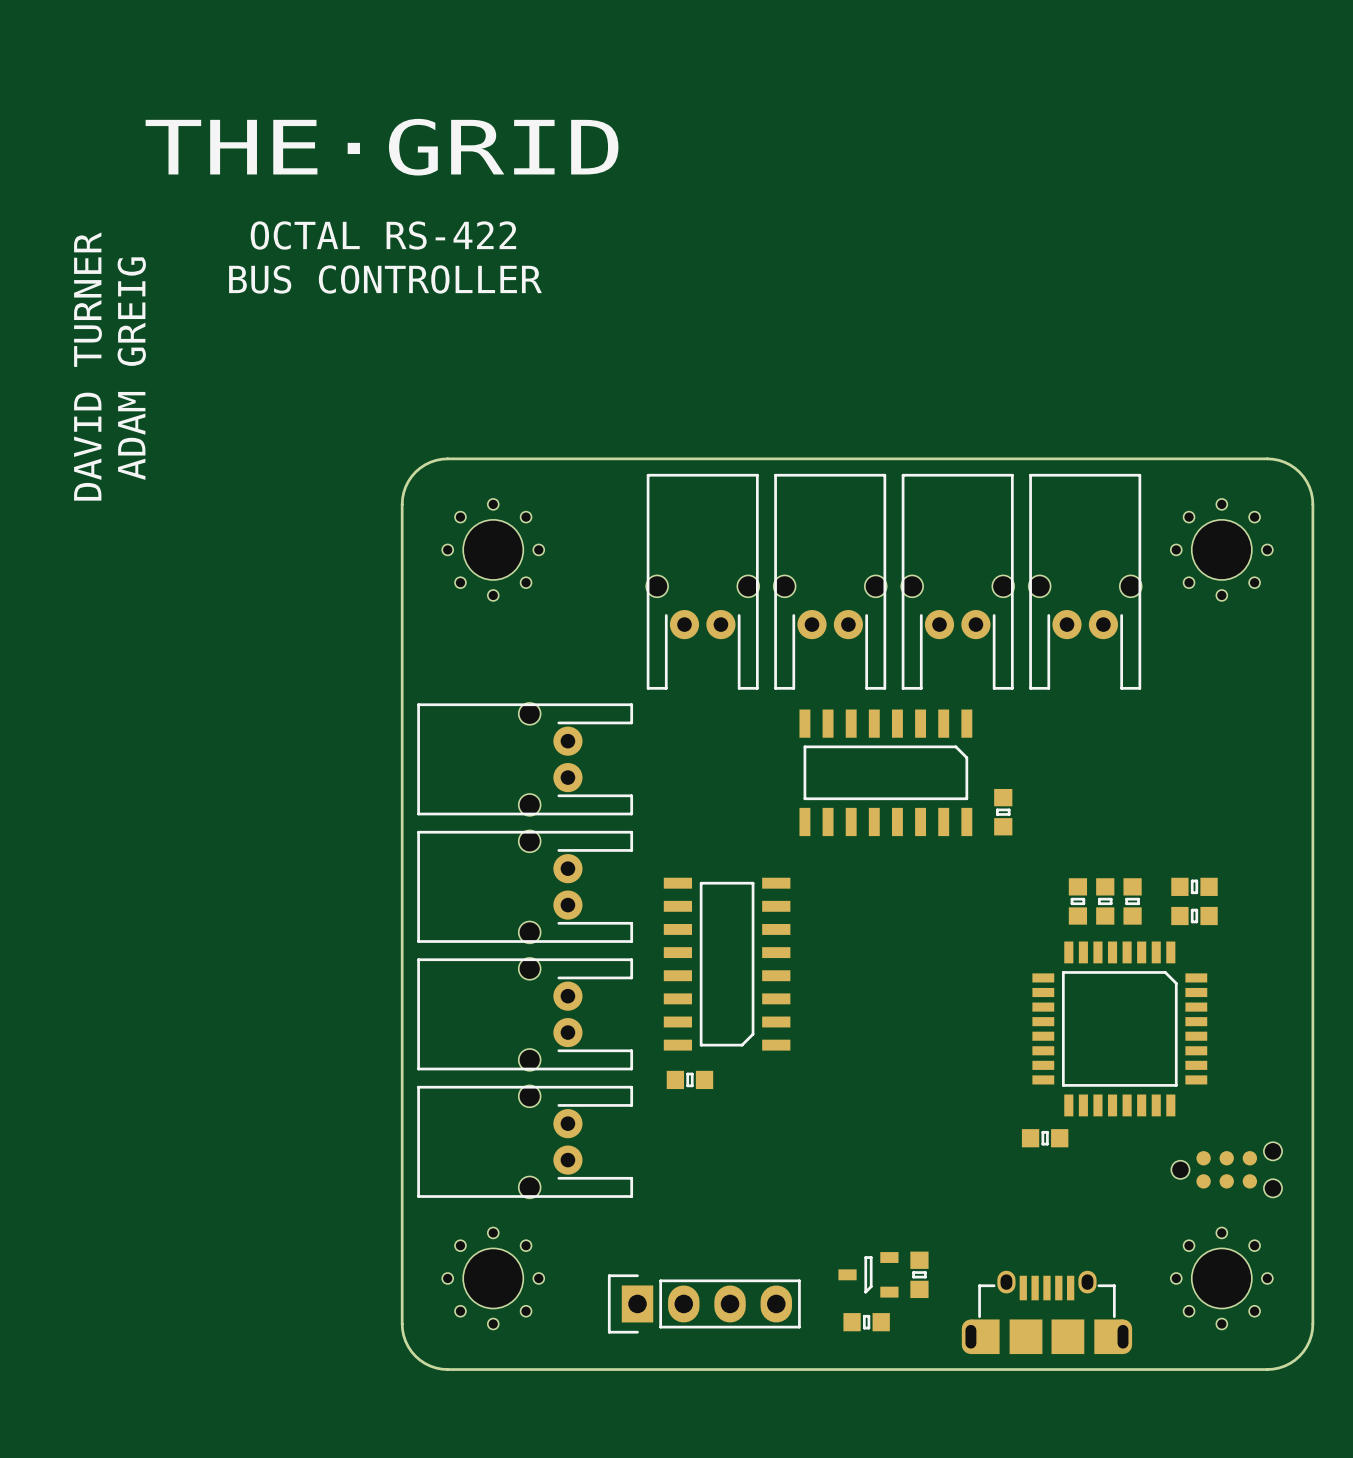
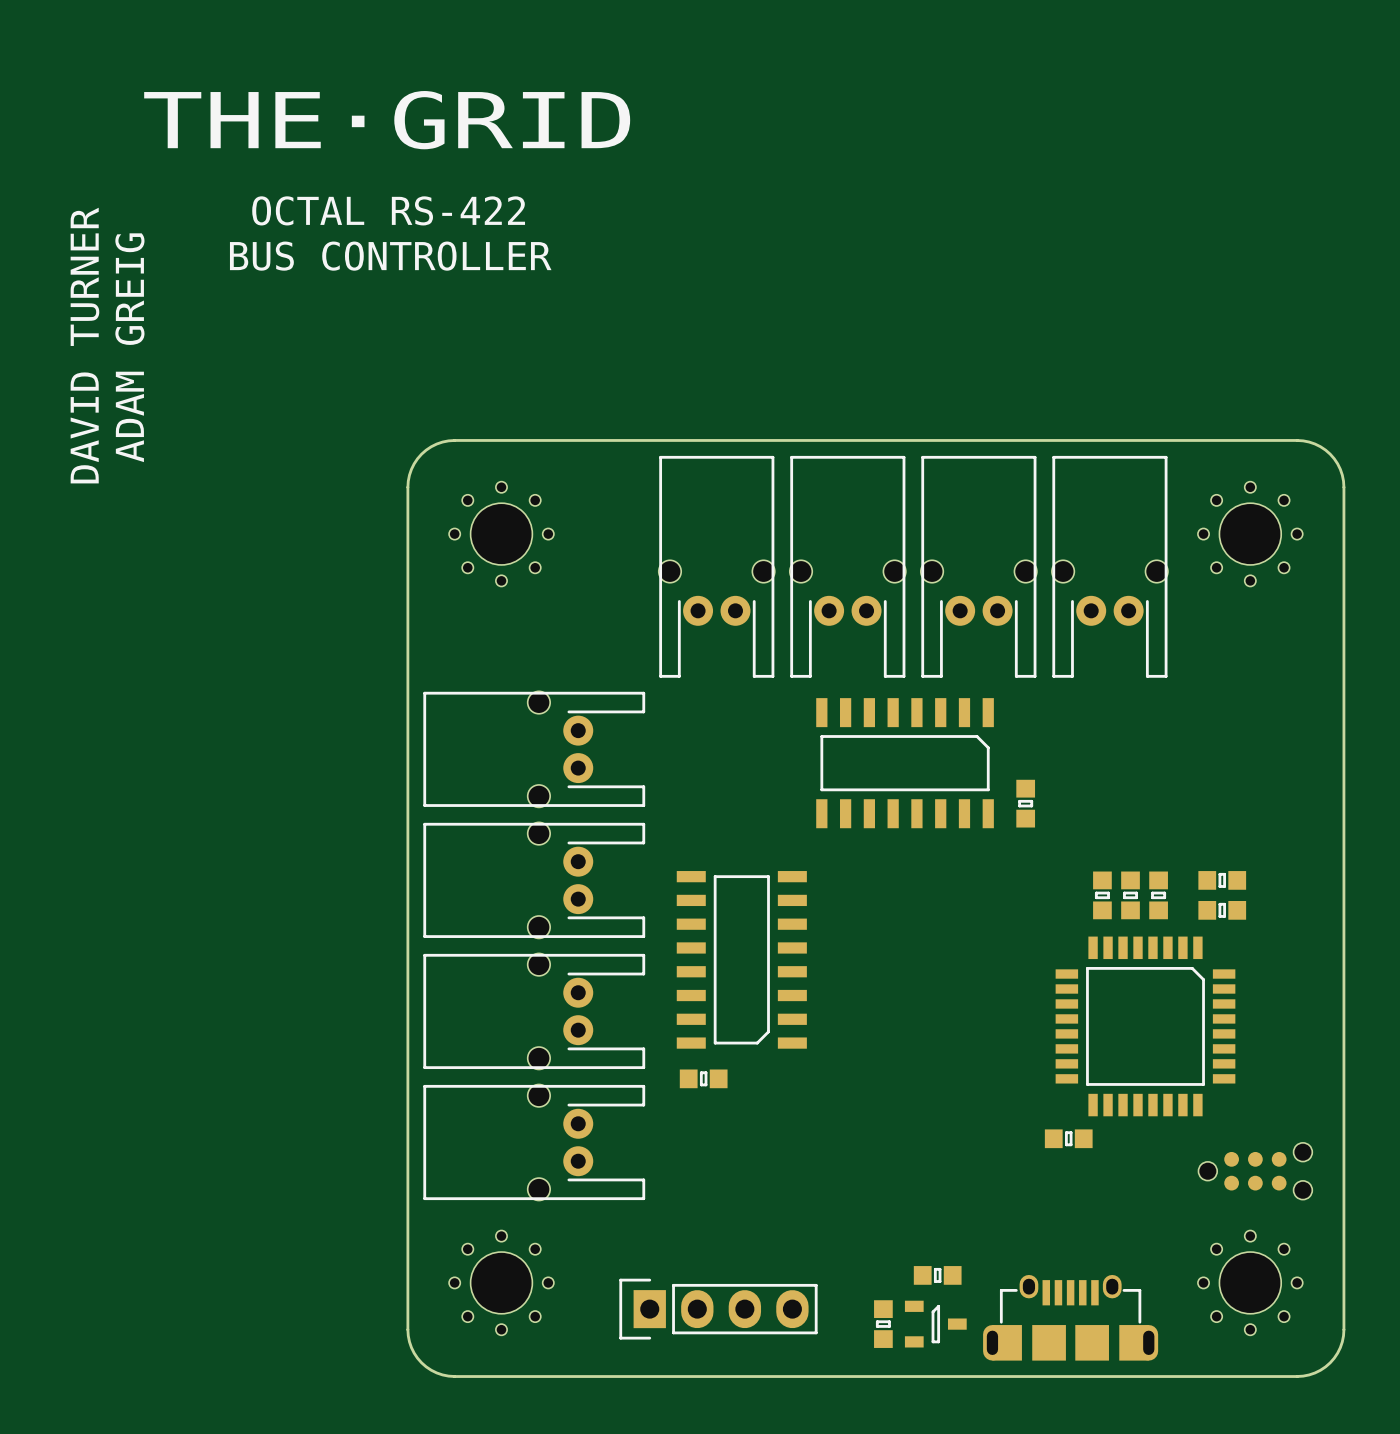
part rotation: 0° (868, 1274) -> 180° (935, 1324)
part position: (868, 1274) -> (935, 1324)
part rotation: 0° (919, 1274) -> 90° clockwise (937, 1275)
part rotation: 0° (866, 1322) -> 90° clockwise (883, 1324)

